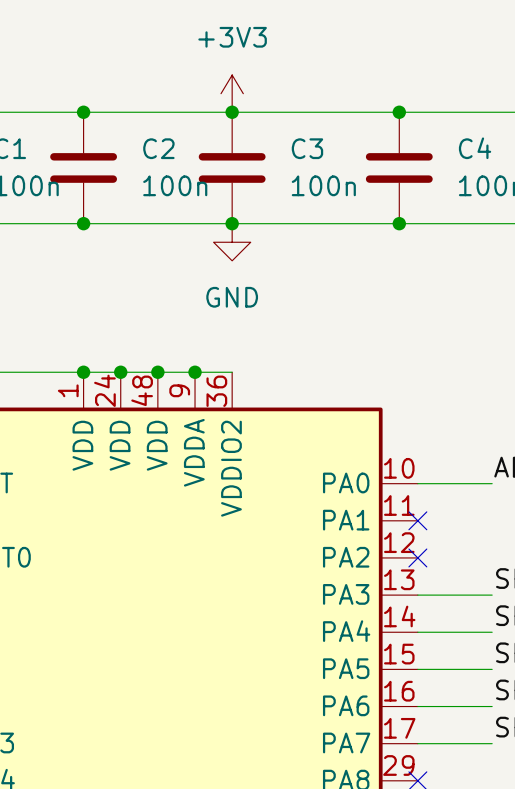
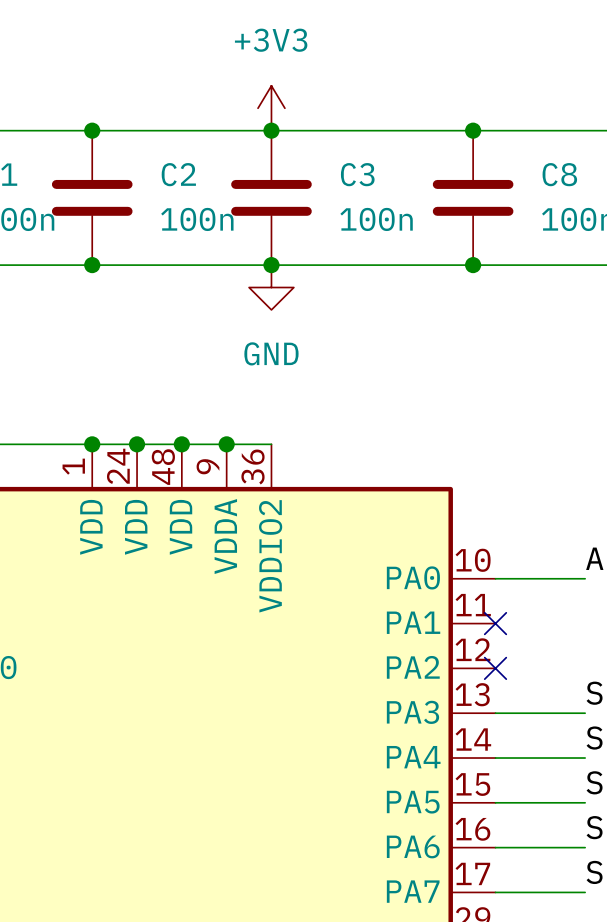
C4 name: C4 (475, 148) -> C8 (559, 174)

